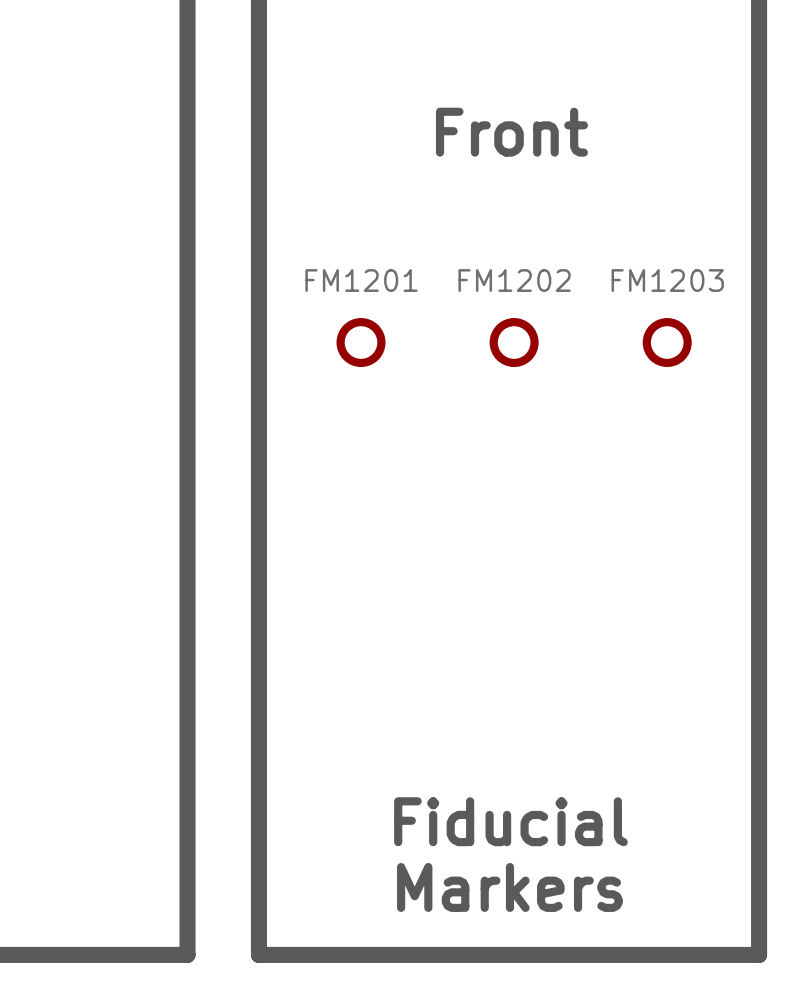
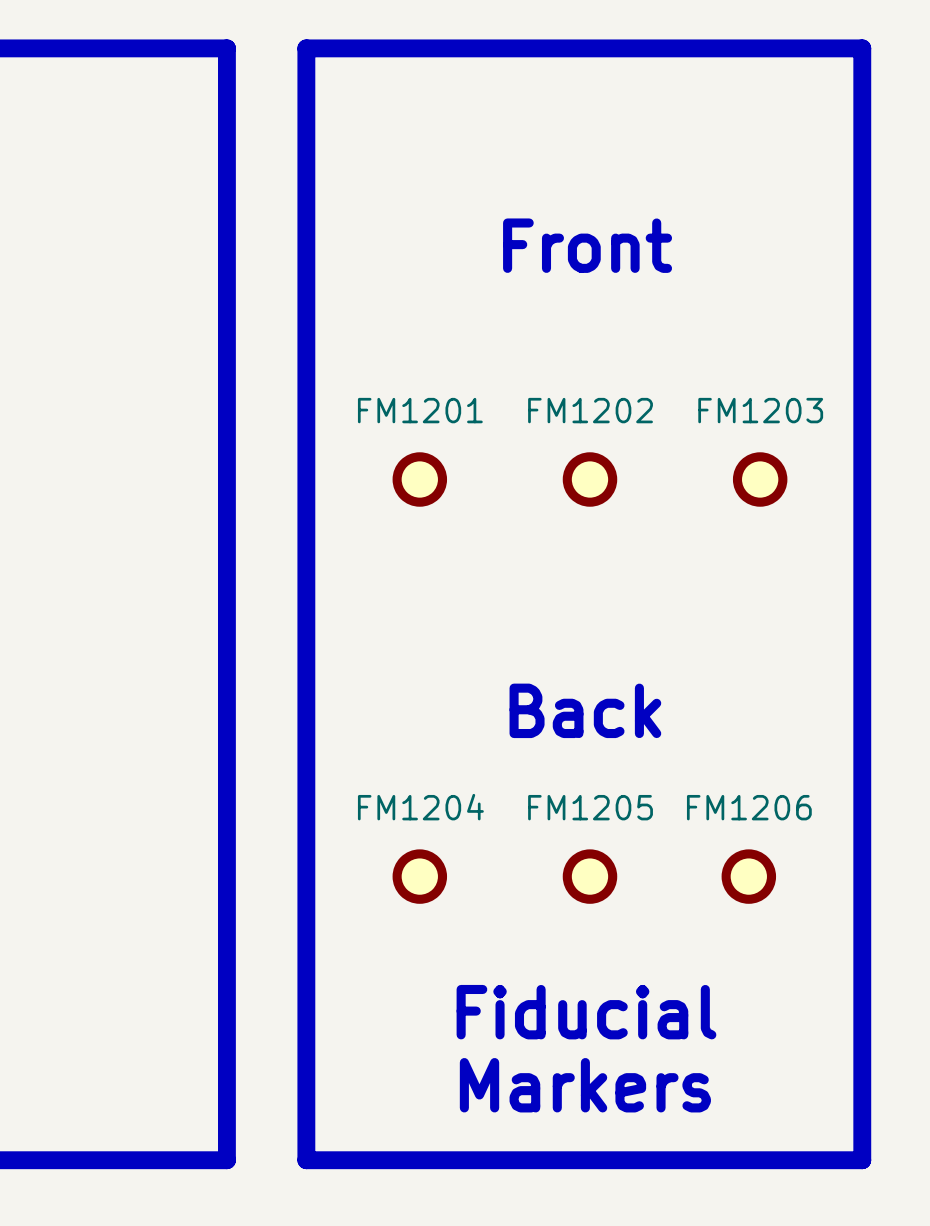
text: none -> Back (585, 710)
FM1204: none -> (419, 876)
FM1205: none -> (589, 876)
FM1206: none -> (748, 876)

